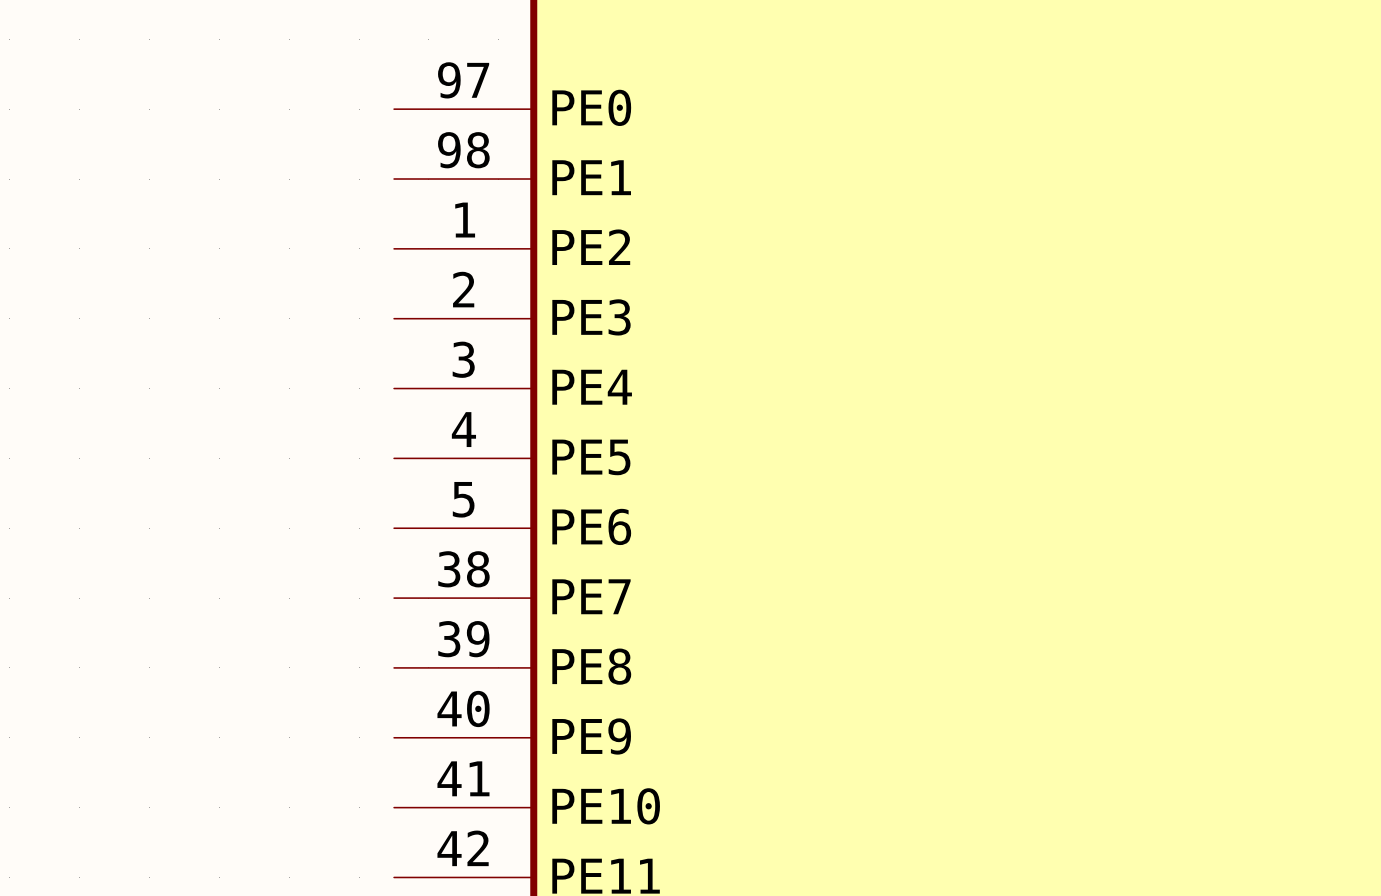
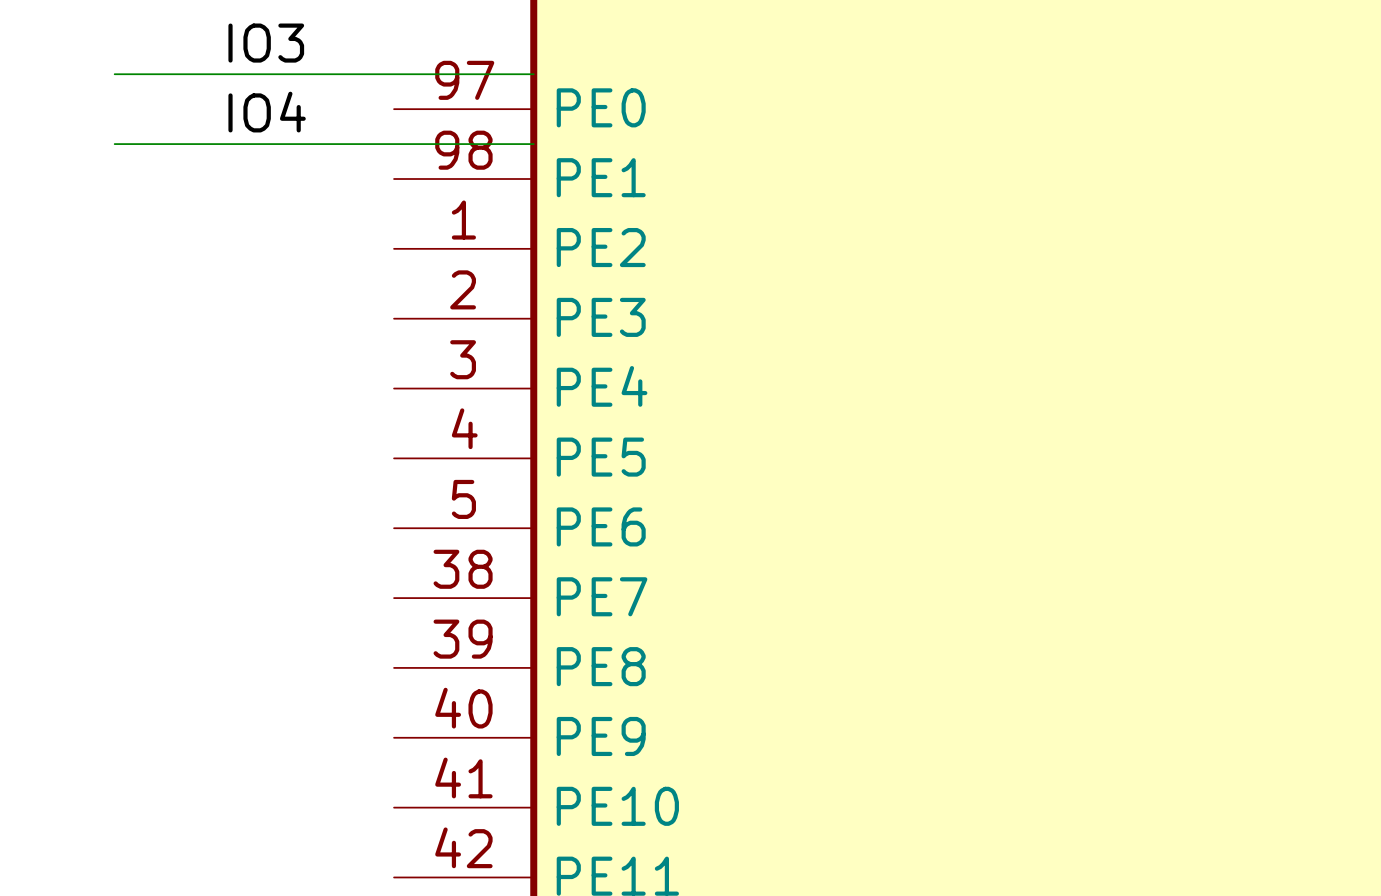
label: none -> IO3 (266, 43)
wire: none -> (114, 74) (533, 74)
label: none -> IO4 (267, 112)
wire: none -> (114, 144) (533, 144)

